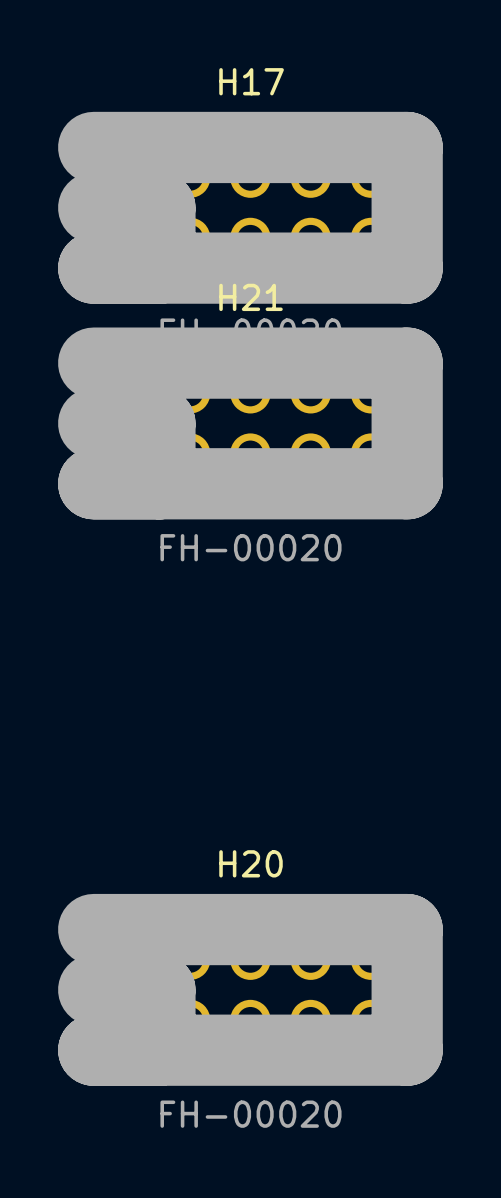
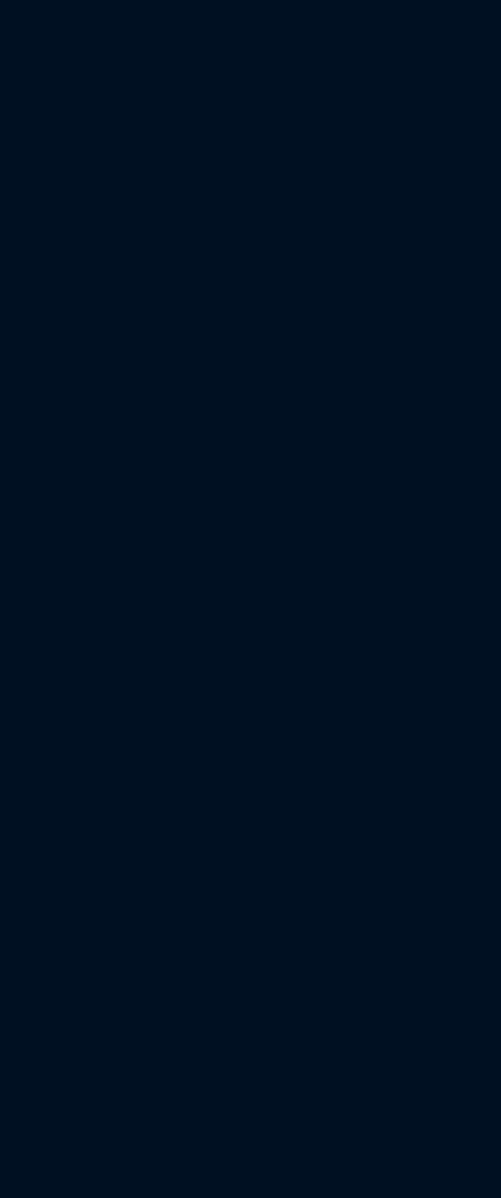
H17: FH-00020 (250, 207) -> none
H21: FH-00020 (250, 423) -> none
H20: FH-00020 (250, 989) -> none

